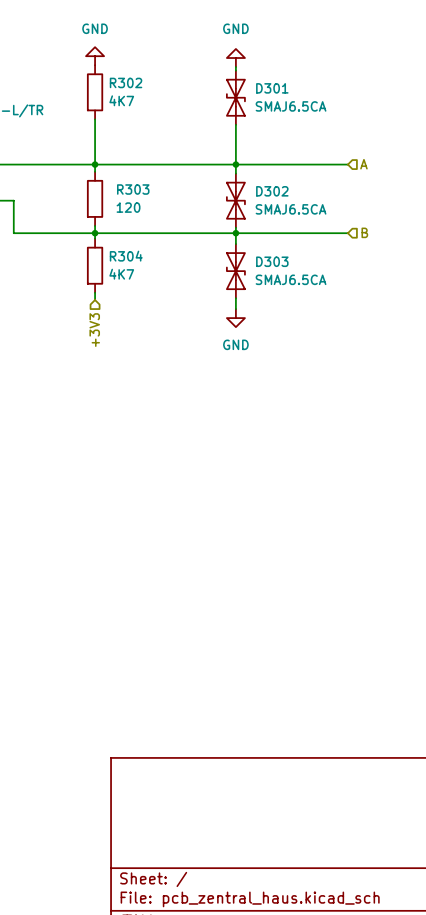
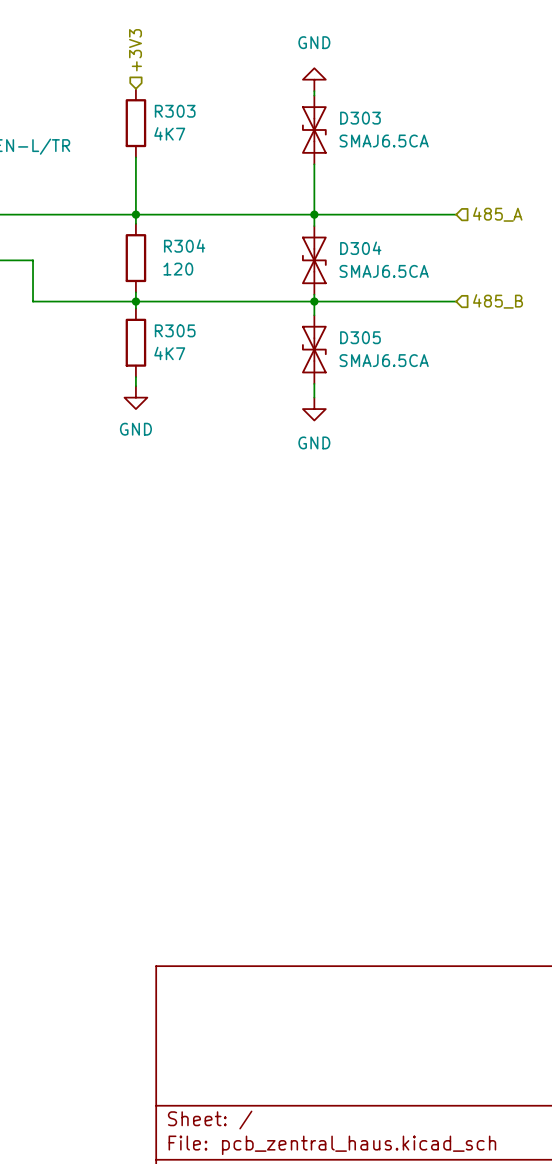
hierarchical label: none -> +3V3 (135, 50)
power symbol: GND (95, 56) -> none
R302 name: R302 (126, 82) -> R303 (175, 111)
D301 name: D301 (272, 88) -> D303 (360, 118)
hierarchical label: A (363, 164) -> 485_A (497, 214)
R303 name: R303 (133, 189) -> R304 (184, 245)
D302 name: D302 (272, 191) -> D304 (360, 248)
hierarchical label: B (364, 232) -> 485_B (498, 301)
R304 name: R304 (126, 256) -> R305 (175, 330)
D303 name: D303 (272, 261) -> D305 (360, 337)
power symbol: none -> GND (135, 397)
hierarchical label: +3V3 (94, 330) -> none

